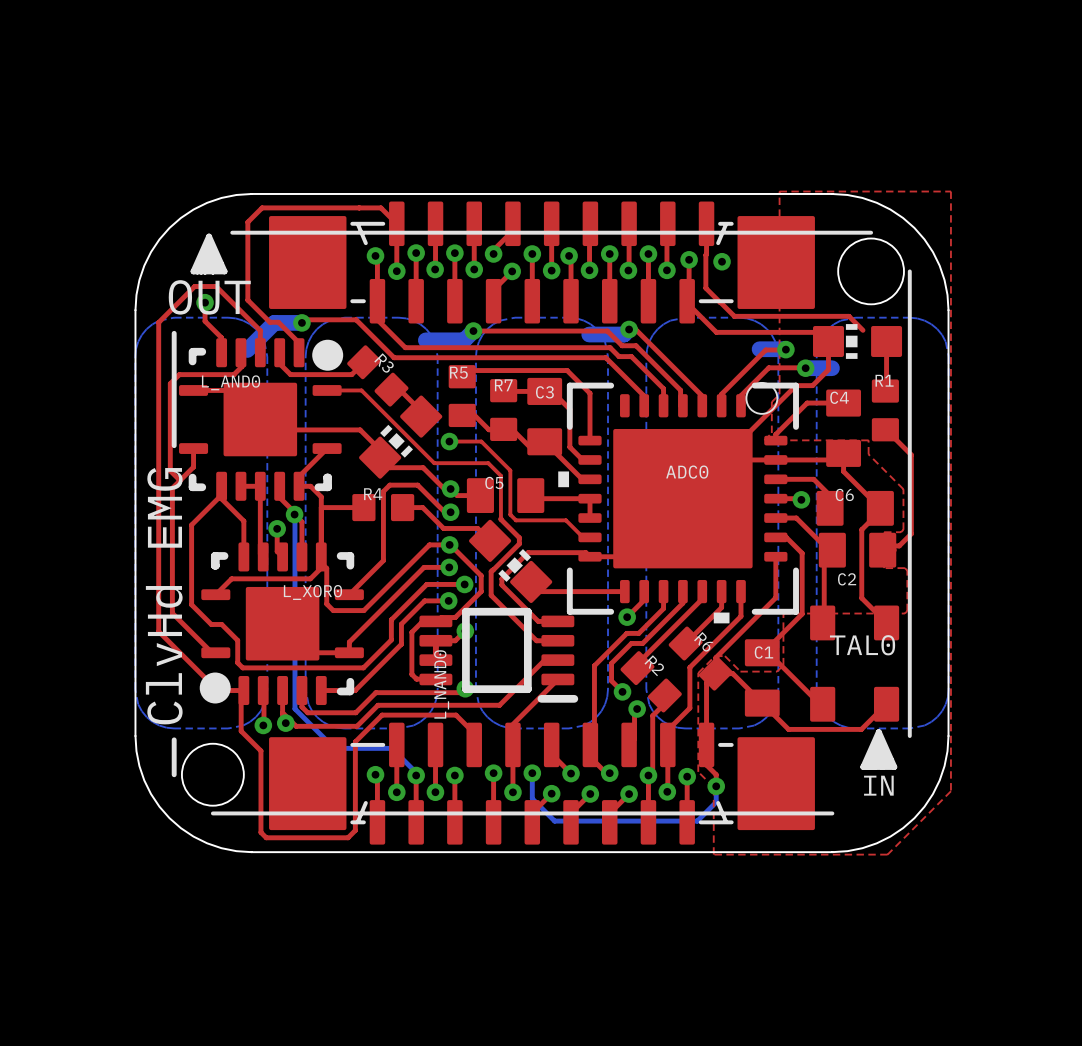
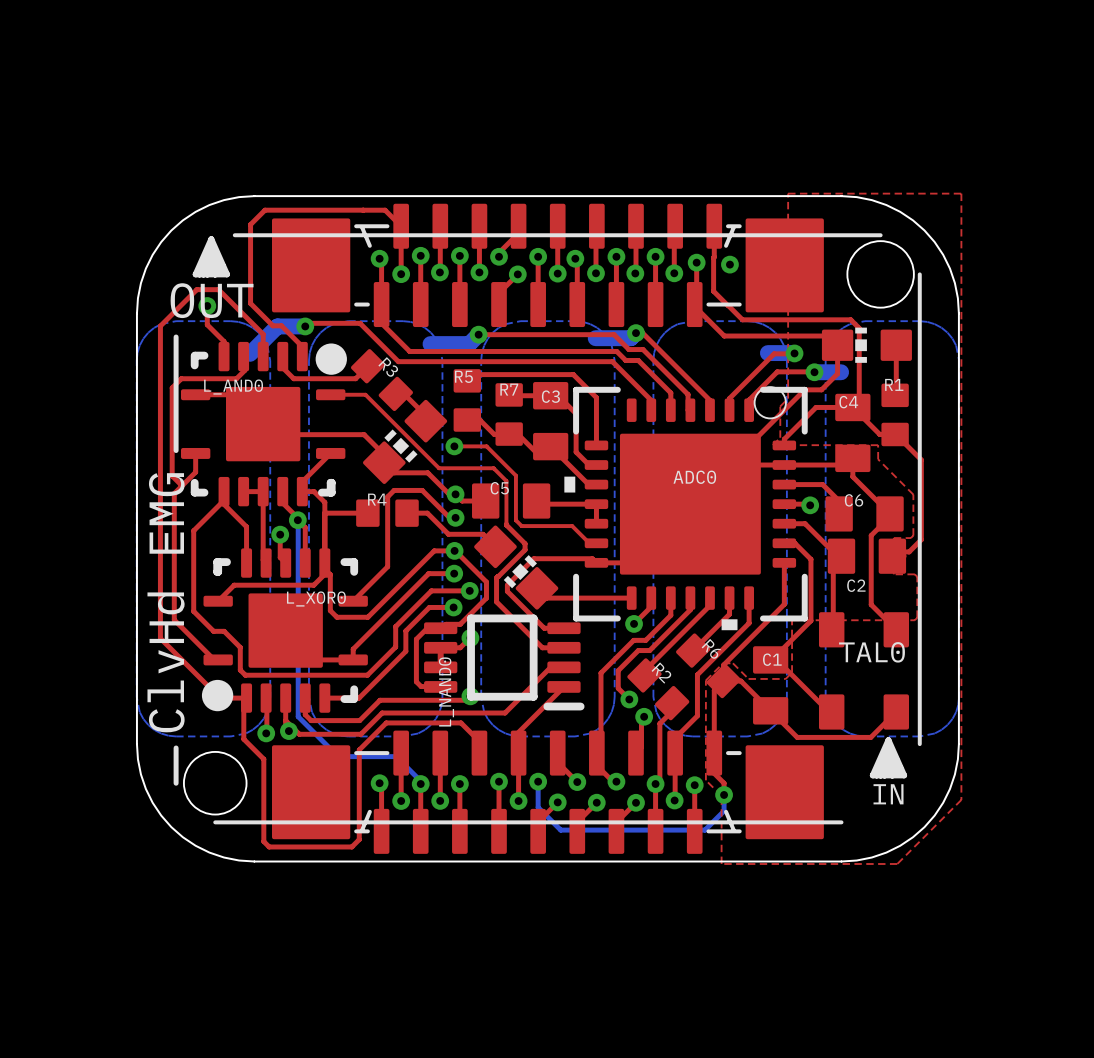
top track: (841, 316) (849, 316) (862, 330) -> (850, 319) (859, 328) (859, 401) (852, 407) (879, 434) (895, 434)

